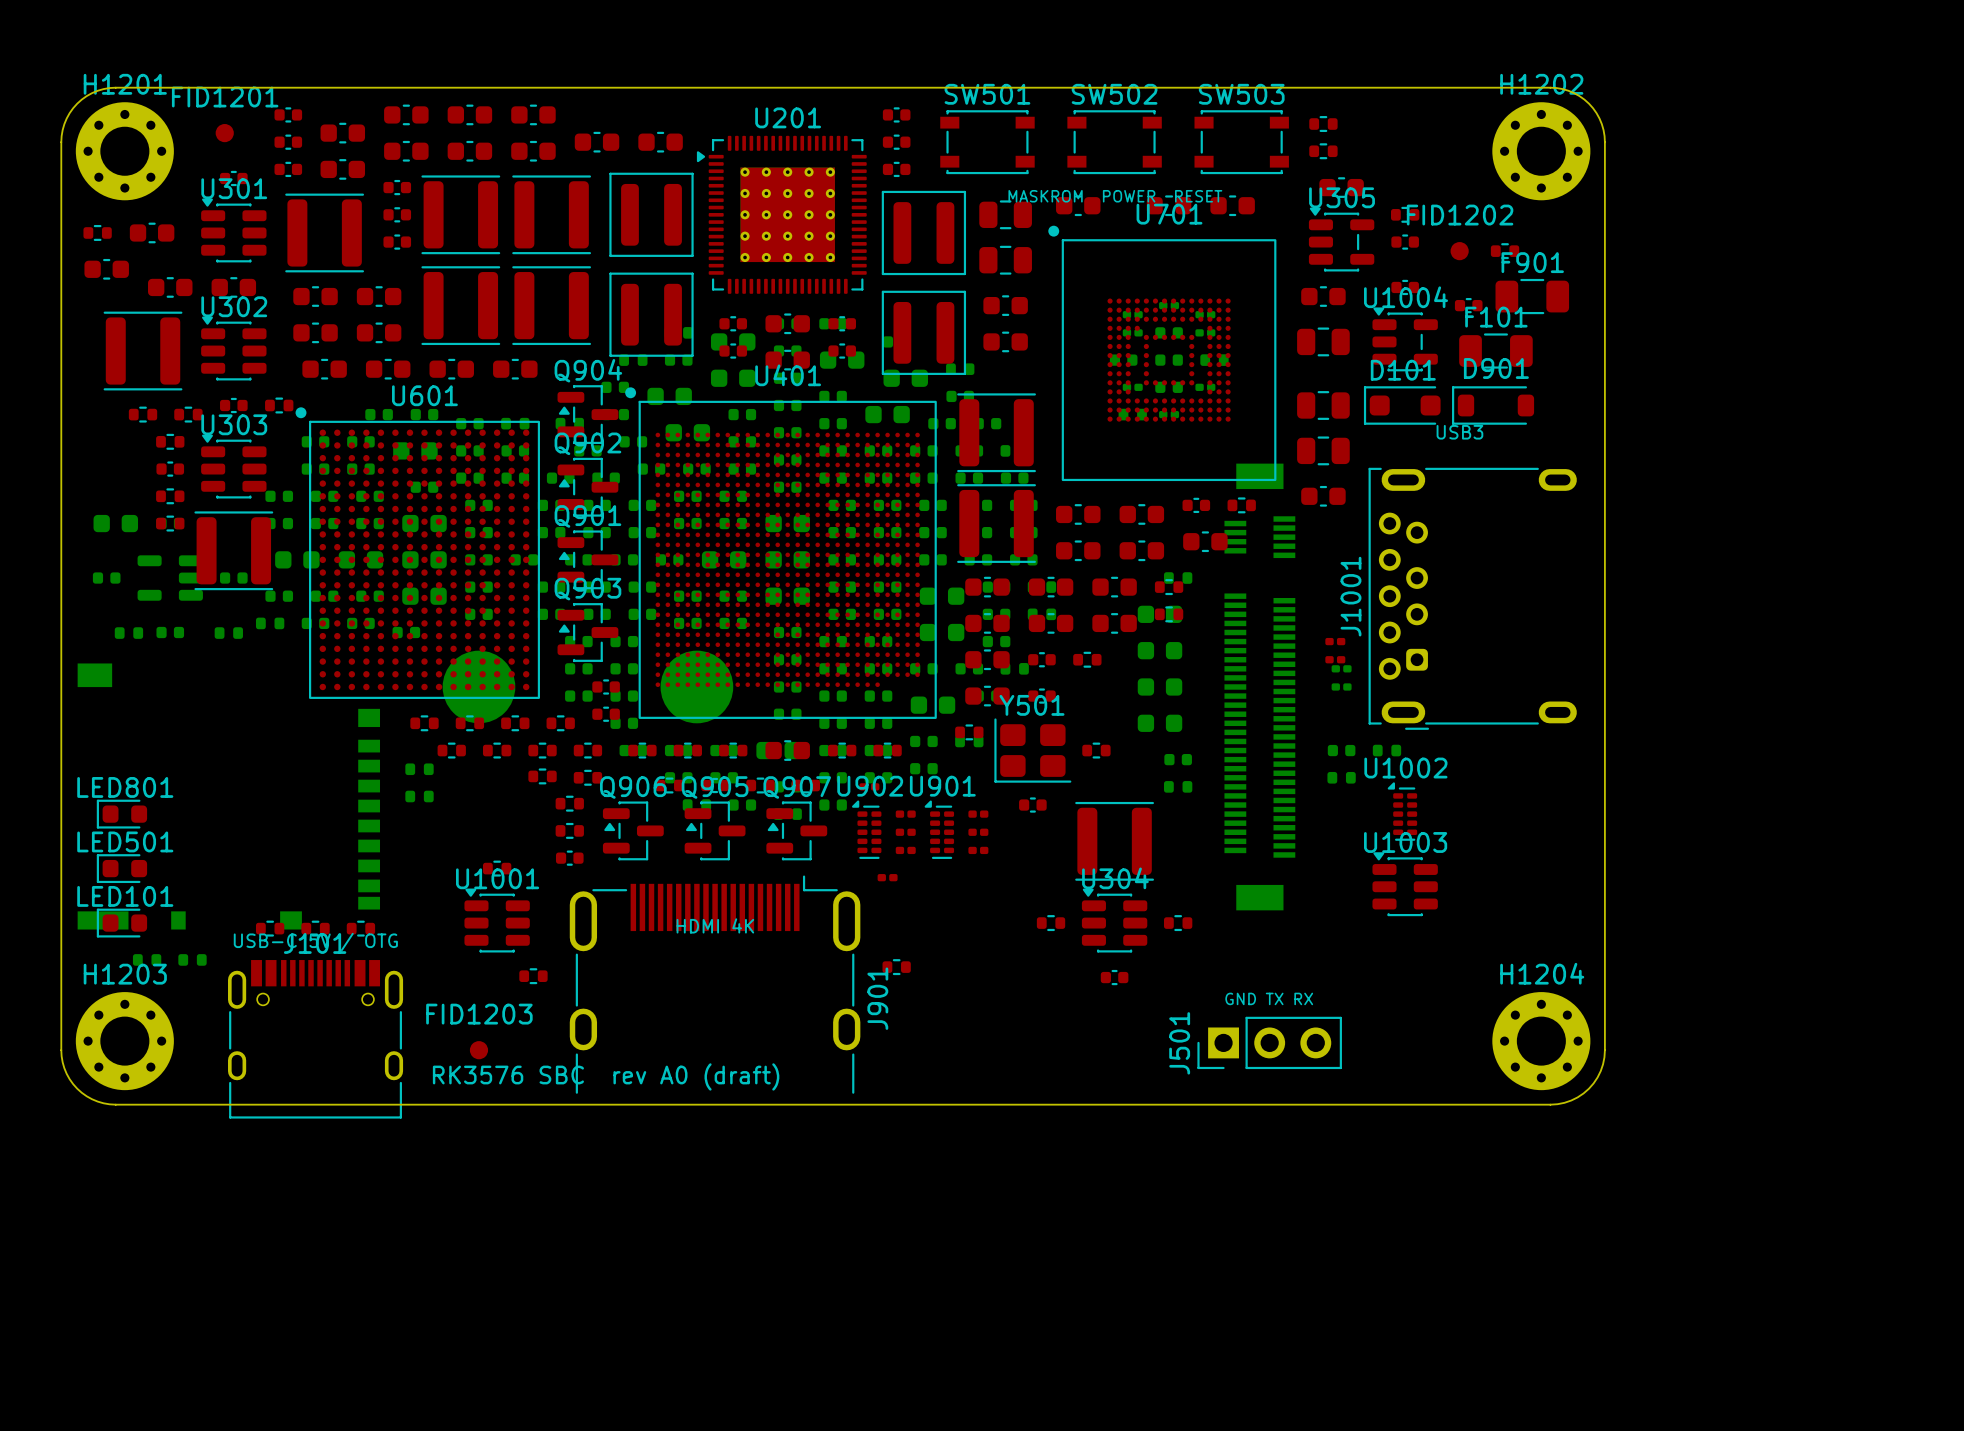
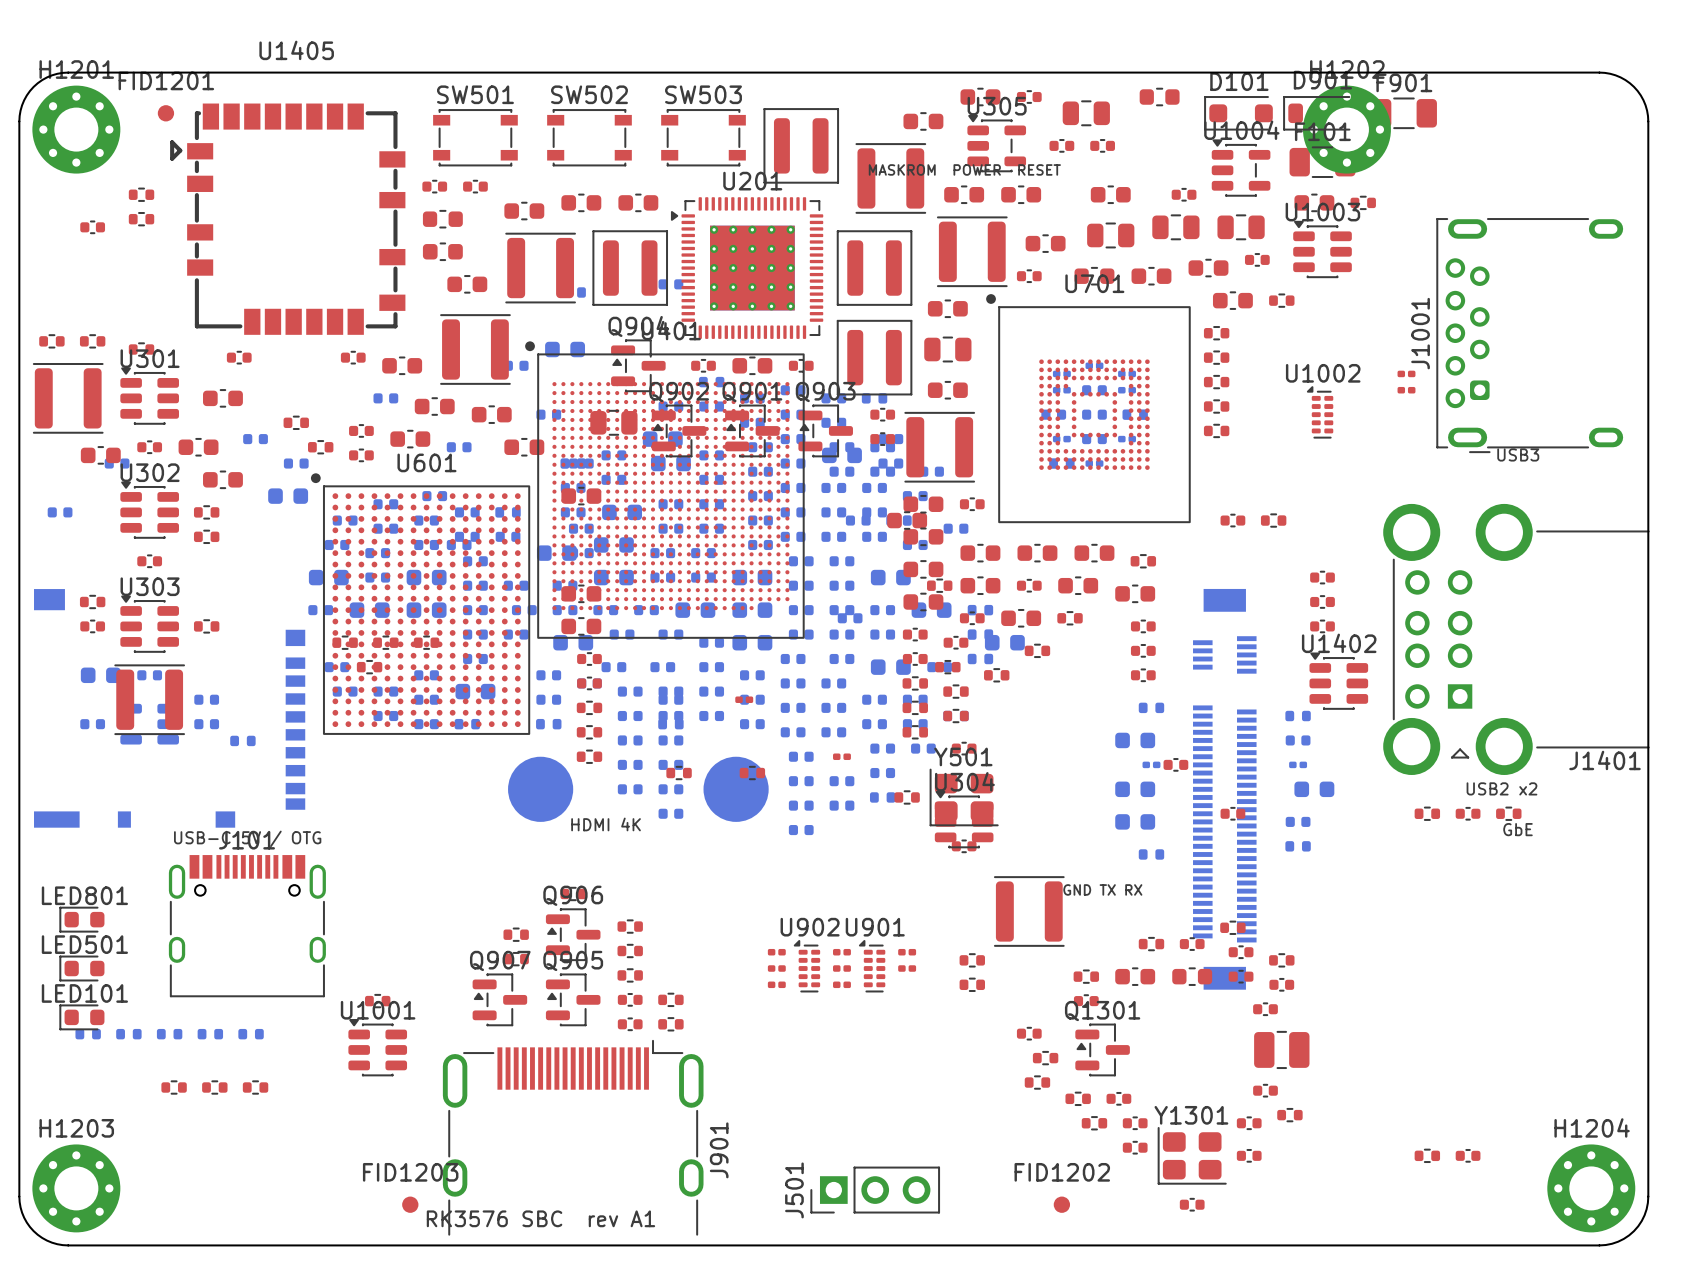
board edge: (1550, 87) (1574, 93) (1588, 103) (1599, 118) (1604, 142) (1604, 1050) (1603, 1064) (1597, 1077) (1588, 1088) (1577, 1097) (1564, 1102) (1550, 1104) (115, 1104) (97, 1101) (77, 1088) (64, 1068) (61, 1050) -> (1355, 72) (1604, 72) (1620, 77) (1634, 86) (1643, 100) (1647, 110) (1648, 1196) (1646, 1209) (1641, 1221) (1634, 1231) (1623, 1238) (1612, 1243) (1599, 1245) (57, 1244) (42, 1237) (33, 1231) (24, 1217) (19, 1202) (19, 935)
part: (288, 114) -> none
part: (406, 114) -> none
part: (469, 114) -> none
part: (533, 114) -> none
part: (896, 114) -> none
part: none -> (980, 97)
part: none -> (1029, 97)
part footprint: [1309, 116, 1338, 133] -> [1139, 87, 1180, 107]
part: (342, 133) -> none
part: none -> (1086, 113)
part: (288, 142) -> none
part: (597, 142) -> none
part: (660, 142) -> none
part: (896, 142) -> none
SW501 position: (987, 142) -> (475, 137)
part: none -> (923, 121)
SW502 position: (1114, 142) -> (589, 137)
SW503 position: (1241, 142) -> (703, 137)
part: (406, 151) -> none
part: (469, 151) -> none
part: (533, 151) -> none
part: (1323, 151) -> none
part: (288, 169) -> none
part: (342, 169) -> none
part: (896, 169) -> none
part: none -> (1061, 145)
part: none -> (1102, 145)
part: (233, 178) -> none
part: (397, 187) -> none
part: (1341, 187) -> none
part: none -> (890, 178)
part: (1078, 205) -> none
part position: (1169, 205) -> (1094, 276)
part: (1232, 205) -> none
part: (397, 214) -> none
part: (460, 214) -> none
part: none -> (434, 186)
part: (551, 214) -> none
part: none -> (475, 186)
part: (651, 214) -> none
U201 position: (781, 214) -> (747, 268)
part: (1005, 214) -> none
part: (1405, 214) -> none
part: none -> (141, 194)
part: none -> (964, 194)
part: none -> (1021, 194)
part: none -> (1110, 194)
part: none -> (1184, 194)
U301 position: (233, 230) -> (149, 396)
part: (97, 232) -> none
part: (152, 232) -> none
part: (324, 232) -> none
part: none -> (581, 202)
part: none -> (638, 202)
part position: (923, 232) -> (801, 145)
part: none -> (1363, 202)
U305 position: (1341, 239) -> (996, 143)
part: (397, 242) -> none
part: none -> (524, 211)
part: (1405, 242) -> none
part footprint: [1490, 243, 1520, 260] -> [1294, 193, 1335, 213]
part: none -> (141, 219)
U1405: none -> (287, 219)
part: none -> (442, 219)
FID1202 position: (1459, 251) -> (1061, 1204)
part: none -> (92, 227)
part: (1005, 260) -> none
part: none -> (1175, 227)
part: none -> (1241, 227)
part: (106, 269) -> none
part: none -> (1110, 235)
part footprint: [609, 272, 694, 357] -> [505, 232, 576, 304]
part: none -> (1045, 243)
part: (170, 287) -> none
part: (233, 287) -> none
part: none -> (442, 251)
part: none -> (972, 251)
part: (1405, 287) -> none
part footprint: [983, 295, 1028, 316] -> [836, 230, 913, 306]
part: (315, 296) -> none
part: (379, 296) -> none
part position: (1323, 296) -> (1151, 276)
part: none -> (1257, 259)
F901 position: (1532, 296) -> (1403, 113)
part: (460, 305) -> none
part: (551, 305) -> none
part: none -> (630, 268)
part: (1169, 305) -> none
part: none -> (1208, 268)
part: (1468, 305) -> none
part: (1132, 314) -> none
part: none -> (1029, 276)
part: (1205, 314) -> none
part: none -> (467, 284)
part: (733, 323) -> none
part: (787, 323) -> none
part: (833, 323) -> none
part: (842, 323) -> none
part: (315, 332) -> none
part: (379, 332) -> none
part: (923, 332) -> none
part: (1132, 332) -> none
part: (1169, 332) -> none
part: (1205, 332) -> none
U1004 position: (1405, 339) -> (1241, 168)
part: (733, 341) -> none
part: (1005, 341) -> none
part: (1323, 341) -> none
part: none -> (1232, 300)
part: none -> (1281, 300)
U302 position: (233, 348) -> (149, 510)
part: (143, 351) -> none
part: (733, 351) -> none
part: (787, 351) -> none
part: (842, 351) -> none
part: none -> (947, 308)
F101 position: (1495, 351) -> (1322, 162)
U701 position: (1162, 353) -> (1088, 408)
part: (633, 360) -> none
part: (678, 360) -> none
part: (787, 360) -> none
part: (842, 360) -> none
part: (1123, 360) -> none
part: (1169, 360) -> none
part: (1214, 360) -> none
part: (324, 369) -> none
part: (388, 369) -> none
part: (451, 369) -> none
part: (515, 369) -> none
part: (960, 369) -> none
part: (733, 378) -> none
part: (787, 378) -> none
part: (905, 378) -> none
part: none -> (1216, 333)
part: none -> (51, 341)
part: none -> (92, 341)
part: (615, 387) -> none
part: (1132, 387) -> none
part: (1169, 387) -> none
part: (1205, 387) -> none
part: none -> (475, 349)
part: (833, 396) -> none
part: (960, 396) -> none
part: none -> (947, 349)
part: (233, 405) -> none
part: (279, 405) -> none
part: none -> (239, 357)
part: (787, 405) -> none
part: none -> (874, 357)
part: (1323, 405) -> none
part: none -> (1216, 357)
D101 position: (1402, 405) -> (1238, 113)
D901 position: (1493, 405) -> (1319, 113)
part: (143, 414) -> none
part position: (188, 414) -> (141, 349)
part: (379, 414) -> none
part side: bottom (424, 414) -> top (353, 357)
part: none -> (402, 365)
Q904 position: (587, 414) -> (638, 365)
part: (742, 414) -> none
part: none -> (703, 365)
part side: bottom (887, 414) -> top (752, 365)
part: none -> (801, 365)
part: (1132, 414) -> none
part: (1169, 414) -> none
part: none -> (1094, 365)
part: (469, 423) -> none
part: (515, 423) -> none
part: (569, 423) -> none
part: (833, 423) -> none
part: (942, 423) -> none
part: (987, 423) -> none
part: none -> (1061, 373)
part: none -> (1127, 373)
part: none -> (1406, 373)
part: (687, 432) -> none
part: (787, 432) -> none
part: none -> (711, 382)
part: (996, 432) -> none
part: none -> (1216, 382)
text position: USB3 (1459, 432) -> USB3 (1518, 454)
part: (170, 441) -> none
part: (315, 441) -> none
part: (360, 441) -> none
part: (633, 441) -> none
part: (742, 441) -> none
part: none -> (793, 390)
part: none -> (947, 390)
part: none -> (1061, 390)
part: none -> (1094, 390)
part: none -> (1127, 390)
part: none -> (1406, 390)
part: none -> (68, 398)
part: none -> (222, 398)
part: (415, 450) -> none
part: (515, 450) -> none
part: (587, 450) -> none
part: (833, 450) -> none
part: (923, 450) -> none
part: (1323, 450) -> none
part: none -> (434, 406)
part: none -> (711, 406)
part: none -> (1216, 406)
U303 position: (233, 466) -> (149, 624)
part position: (170, 469) -> (149, 447)
part: (315, 469) -> none
part: (360, 469) -> none
part: none -> (491, 414)
part: (696, 469) -> none
part: (742, 469) -> none
part: none -> (793, 414)
part: none -> (882, 414)
part: none -> (1053, 414)
part: none -> (1094, 414)
part: none -> (1135, 414)
part: none -> (296, 422)
part: (469, 478) -> none
part: (515, 478) -> none
part: (560, 478) -> none
part: (606, 478) -> none
part: none -> (613, 422)
part: (833, 478) -> none
part: (923, 478) -> none
part: (1014, 478) -> none
part footprint: [773, 481, 802, 493] -> [642, 431, 683, 447]
part: (424, 487) -> none
part: none -> (361, 430)
Q902 position: (587, 487) -> (679, 430)
part: none -> (1216, 430)
part: (170, 496) -> none
part: (279, 496) -> none
part: (370, 496) -> none
part: none -> (410, 439)
part: (687, 496) -> none
part: (733, 496) -> none
part: none -> (793, 439)
part: none -> (882, 439)
part: none -> (890, 439)
part: none -> (1061, 439)
part: none -> (1094, 439)
part: none -> (1127, 439)
part: (1323, 496) -> none
part: none -> (198, 447)
part: none -> (320, 447)
part: (478, 505) -> none
part: (597, 505) -> none
part: none -> (524, 447)
part: (642, 505) -> none
part: (842, 505) -> none
part: (932, 505) -> none
part: none -> (939, 447)
part: (1196, 505) -> none
part: (1241, 505) -> none
part: none -> (100, 455)
part: none -> (361, 455)
part: none -> (613, 455)
part: none -> (711, 455)
part: none -> (841, 455)
part: (1078, 514) -> none
part: (1141, 514) -> none
part: (115, 523) -> none
part: (170, 523) -> none
part: (279, 523) -> none
part: (324, 523) -> none
part: (424, 523) -> none
part: none -> (573, 463)
part: (733, 523) -> none
part: none -> (793, 463)
part: (996, 523) -> none
part: none -> (890, 463)
part: none -> (1061, 463)
part: none -> (1094, 463)
part: (478, 532) -> none
part: (551, 532) -> none
part: (597, 532) -> none
part: (642, 532) -> none
part: (842, 532) -> none
part: (932, 532) -> none
part: none -> (931, 471)
part: none -> (222, 479)
part: none -> (613, 479)
part: none -> (711, 479)
part: (1205, 541) -> none
part: (233, 550) -> none
part: none -> (573, 487)
part: none -> (793, 487)
part: none -> (833, 487)
part: none -> (874, 487)
part position: (1078, 550) -> (923, 504)
part: (1141, 550) -> none
part footprint: [765, 551, 810, 569] -> [658, 499, 684, 510]
U601 position: (417, 553) -> (420, 604)
part: (297, 559) -> none
part: (424, 559) -> none
part: (478, 559) -> none
part: (578, 559) -> none
Q901 position: (587, 559) -> (752, 430)
part: (624, 559) -> none
part: (669, 559) -> none
part: none -> (581, 496)
part position: (724, 559) -> (622, 512)
part: (842, 559) -> none
part: (932, 559) -> none
part: (978, 559) -> none
part: (1023, 559) -> none
part: none -> (915, 496)
part: none -> (385, 504)
part: none -> (711, 504)
part: none -> (972, 504)
part position: (170, 578) -> (149, 724)
part: (233, 578) -> none
part: none -> (206, 512)
part: none -> (467, 512)
part: none -> (508, 512)
part: none -> (573, 512)
part: none -> (793, 512)
part: none -> (833, 512)
part: none -> (874, 512)
part: (1178, 578) -> none
part footprint: [402, 587, 447, 605] -> [332, 515, 358, 526]
part: (478, 587) -> none
part: none -> (426, 520)
part: (551, 587) -> none
part: (597, 587) -> none
part: (642, 587) -> none
part footprint: [765, 587, 810, 605] -> [658, 523, 684, 534]
part: (842, 587) -> none
part: (987, 587) -> none
part: (1114, 587) -> none
part: (1169, 587) -> none
part: none -> (1232, 520)
part: none -> (1273, 520)
part: (279, 596) -> none
part: (324, 596) -> none
part: (370, 596) -> none
part: none -> (385, 528)
part: (733, 596) -> none
part: none -> (711, 528)
part: (942, 596) -> none
part: none -> (956, 528)
J1001 position: (1472, 598) -> (1529, 335)
part: none -> (206, 536)
part: none -> (467, 536)
part: none -> (508, 536)
part: none -> (793, 536)
part: none -> (833, 536)
part: none -> (874, 536)
part: none -> (923, 536)
part: (478, 614) -> none
part: none -> (426, 544)
part: (597, 614) -> none
part: (642, 614) -> none
part: none -> (613, 544)
part: (842, 614) -> none
part: (996, 614) -> none
part: (1041, 614) -> none
part: none -> (915, 544)
part: (1159, 614) -> none
part: (1169, 614) -> none
part: (270, 623) -> none
part: (315, 623) -> none
part: (360, 623) -> none
part: none -> (377, 553)
part: none -> (556, 553)
part: (733, 623) -> none
part: none -> (662, 553)
part: none -> (703, 553)
part footprint: [919, 623, 965, 642] -> [788, 556, 814, 567]
part: (987, 623) -> none
part: (1051, 623) -> none
part position: (1114, 623) -> (980, 553)
part: none -> (1037, 553)
part: none -> (1094, 553)
part: (170, 632) -> none
part: none -> (149, 561)
part position: (406, 632) -> (336, 544)
part: none -> (475, 561)
Q903 position: (587, 632) -> (825, 430)
part: (787, 632) -> none
part: none -> (841, 561)
part: none -> (1143, 561)
part: (128, 633) -> none
part: (228, 633) -> none
part: (578, 641) -> none
part: (624, 641) -> none
part: (833, 641) -> none
part: (878, 641) -> none
part: (996, 641) -> none
part: none -> (923, 569)
part: (1335, 641) -> none
part: none -> (328, 577)
part: none -> (377, 577)
part: none -> (426, 577)
part: none -> (613, 577)
part: none -> (662, 577)
part: none -> (703, 577)
part: none -> (752, 577)
part: none -> (890, 577)
part: (1159, 650) -> none
part: none -> (1322, 577)
part: none -> (475, 585)
part: none -> (516, 585)
part: none -> (565, 585)
part: (787, 659) -> none
part: none -> (801, 585)
part: none -> (841, 585)
part: (987, 659) -> none
part: (1041, 659) -> none
part: none -> (980, 585)
part: none -> (1029, 585)
part: none -> (1078, 585)
part: (1335, 659) -> none
part: (578, 668) -> none
part: (624, 668) -> none
part: none -> (581, 593)
part: (833, 668) -> none
part: (878, 668) -> none
part: (923, 668) -> none
part: (969, 668) -> none
part: (1014, 668) -> none
part: none -> (1135, 593)
part: (1341, 668) -> none
part: none -> (92, 601)
part: none -> (923, 601)
part: none -> (1322, 601)
part: none -> (320, 610)
part: none -> (369, 610)
part: (478, 686) -> none
part: none -> (426, 610)
part: none -> (475, 610)
part: (606, 686) -> none
part: none -> (524, 610)
part: none -> (565, 610)
part: (696, 686) -> none
part: none -> (605, 610)
part: none -> (646, 610)
part: (787, 686) -> none
part: none -> (695, 610)
part: none -> (752, 610)
part: none -> (801, 610)
part: none -> (841, 610)
part: none -> (882, 610)
part: none -> (931, 610)
part: none -> (980, 610)
part: (1159, 686) -> none
part position: (1259, 686) -> (1224, 789)
part: (1341, 686) -> none
part: (578, 696) -> none
part: (624, 696) -> none
part: (833, 696) -> none
part: (878, 696) -> none
part: (987, 696) -> none
part: (1041, 696) -> none
part: none -> (972, 618)
part: none -> (1021, 618)
part: none -> (1070, 618)
part: none -> (92, 626)
part: none -> (206, 626)
part: none -> (581, 626)
part: (932, 705) -> none
part: none -> (1143, 626)
part: none -> (1322, 626)
part: none -> (475, 634)
part: (606, 714) -> none
part: none -> (516, 634)
part: none -> (622, 634)
part: none -> (801, 634)
part: none -> (841, 634)
part: none -> (882, 634)
part: none -> (915, 634)
part: none -> (980, 634)
part footprint: [864, 717, 893, 729] -> [732, 634, 773, 651]
J1401: none -> (1516, 639)
part: (560, 723) -> none
part: (624, 723) -> none
part: none -> (573, 642)
part: none -> (956, 642)
part: (969, 732) -> none
part: none -> (1037, 650)
part: none -> (1143, 650)
part: none -> (475, 659)
part: none -> (589, 659)
part footprint: [756, 741, 801, 760] -> [650, 662, 676, 673]
part: (969, 741) -> none
part: none -> (841, 659)
part: none -> (915, 659)
part: none -> (980, 659)
part: none -> (336, 667)
part: (497, 750) -> none
part: (542, 750) -> none
part: (587, 750) -> none
part: (633, 750) -> none
part: (642, 750) -> none
part: (678, 750) -> none
part: (687, 750) -> none
part: (733, 750) -> none
part: (787, 750) -> none
part: (842, 750) -> none
part: (878, 750) -> none
part: (887, 750) -> none
Y501 position: (1032, 750) -> (964, 797)
part: none -> (890, 667)
part: none -> (939, 667)
part: (1341, 750) -> none
part: (1386, 750) -> none
part: none -> (100, 675)
part: none -> (149, 675)
part: none -> (426, 675)
part: none -> (548, 675)
part: none -> (752, 675)
part: none -> (996, 675)
part: (1178, 759) -> none
part: none -> (1143, 675)
U1402: none -> (1338, 681)
part: none -> (589, 683)
part: none -> (833, 683)
part: none -> (915, 683)
part: (419, 769) -> none
part: (542, 776) -> none
part: none -> (345, 691)
part: none -> (385, 691)
part: none -> (475, 691)
part: (587, 777) -> none
part: (678, 777) -> none
part: (724, 777) -> none
part: none -> (630, 691)
part: none -> (670, 691)
part: (878, 777) -> none
part: none -> (956, 691)
part position: (1341, 777) -> (1151, 707)
part: (669, 785) -> none
part: (715, 785) -> none
part: (760, 785) -> none
part: (805, 785) -> none
part: none -> (149, 699)
part: none -> (206, 699)
part: none -> (426, 699)
part: none -> (548, 699)
part: none -> (752, 699)
part: none -> (874, 699)
part: none -> (915, 699)
part: (1178, 786) -> none
part: none -> (589, 707)
part: none -> (793, 707)
part: none -> (833, 707)
part: none -> (915, 707)
part: (419, 796) -> none
part footprint: [1075, 801, 1155, 881] -> [951, 741, 977, 756]
part: (569, 803) -> none
part: none -> (385, 716)
part position: (696, 805) -> (548, 724)
part: none -> (670, 716)
part: (1032, 805) -> none
part: none -> (956, 716)
part: none -> (1298, 716)
U1002 position: (1402, 811) -> (1320, 412)
LED801 position: (121, 814) -> (81, 919)
part: none -> (92, 724)
part: none -> (206, 724)
part: none -> (426, 724)
part: none -> (467, 724)
part: none -> (752, 724)
part: (905, 814) -> none
part: (978, 814) -> none
part: none -> (874, 724)
part: none -> (915, 724)
part: none -> (589, 732)
part: none -> (793, 732)
part: none -> (833, 732)
part: none -> (915, 732)
U902 position: (866, 829) -> (806, 966)
U901 position: (939, 829) -> (872, 966)
part: (569, 830) -> none
Q906 position: (633, 830) -> (573, 934)
Q905 position: (715, 830) -> (573, 999)
Q907 position: (796, 830) -> (499, 999)
part: none -> (242, 740)
part: none -> (630, 740)
part: none -> (670, 740)
part: (905, 832) -> none
part: (978, 832) -> none
part: none -> (1135, 740)
part: none -> (1298, 740)
part: none -> (882, 748)
part: none -> (923, 748)
part: none -> (589, 756)
part: (905, 850) -> none
part: none -> (801, 756)
part: (569, 858) -> none
part: none -> (630, 764)
part: none -> (670, 764)
part: none -> (1151, 764)
part: none -> (1175, 764)
part: none -> (1298, 764)
LED501 position: (121, 868) -> (81, 968)
part: (497, 868) -> none
part: none -> (679, 773)
part: none -> (882, 773)
part footprint: [877, 874, 898, 882] -> [739, 765, 766, 781]
part: none -> (801, 781)
part: none -> (841, 781)
U1003 position: (1405, 884) -> (1322, 249)
part: none -> (540, 789)
part: none -> (630, 789)
part: none -> (670, 789)
part: none -> (736, 789)
part: none -> (1135, 789)
part: none -> (1314, 789)
text: none -> USB2 x2 (1501, 788)
part: none -> (882, 797)
part: none -> (801, 805)
part: none -> (841, 805)
part: none -> (670, 813)
part: none -> (1232, 813)
part: none -> (1427, 813)
part: none -> (1468, 813)
part: none -> (1508, 813)
U1001 position: (497, 920) -> (377, 1047)
LED101 position: (121, 923) -> (81, 1017)
part position: (1051, 923) -> (907, 797)
part: (1178, 923) -> none
part: none -> (1135, 821)
part: none -> (1298, 821)
part: (270, 928) -> none
part: (315, 928) -> none
part: (360, 928) -> none
text: none -> GbE (1517, 829)
part: none -> (801, 830)
part: none -> (1298, 846)
part: (147, 959) -> none
part: (192, 959) -> none
part: none -> (1151, 854)
part: (896, 967) -> none
part: (533, 976) -> none
part position: (1114, 977) -> (964, 846)
J901 position: (715, 984) -> (573, 1137)
part: none -> (573, 893)
part: none -> (1029, 911)
part: none -> (630, 926)
H1203 position: (124, 1041) -> (76, 1188)
part: none -> (1232, 927)
H1204 position: (1541, 1041) -> (1591, 1188)
J501 position: (1269, 1042) -> (875, 1190)
part: none -> (516, 934)
FID1203 position: (478, 1050) -> (410, 1204)
part: none -> (1151, 944)
part: none -> (1192, 944)
part: none -> (630, 950)
part: none -> (776, 952)
part: none -> (841, 952)
part: none -> (907, 952)
part: none -> (1241, 952)
text: RK3576 SBC rev A0 (draft) (606, 1076) -> none
part: none -> (516, 959)
part: none -> (972, 960)
part: none -> (1281, 960)
part: none -> (776, 968)
part: none -> (841, 968)
part: none -> (907, 968)
part: none -> (630, 975)
part: none -> (1086, 976)
part: none -> (1135, 976)
part: none -> (1192, 976)
part: none -> (1241, 976)
part: none -> (776, 984)
part: none -> (841, 984)
part: none -> (972, 984)
part: none -> (1281, 984)
part: none -> (630, 999)
part: none -> (670, 999)
part: none -> (377, 1001)
part: none -> (1086, 1001)
part: none -> (1265, 1009)
part: none -> (630, 1024)
part: none -> (670, 1024)
part: none -> (88, 1034)
part: none -> (128, 1034)
part: none -> (169, 1034)
part: none -> (210, 1034)
part: none -> (251, 1034)
part: none -> (1029, 1033)
Q1301: none -> (1102, 1049)
part: none -> (1281, 1049)
part: none -> (1045, 1058)
part: none -> (1037, 1082)
part: none -> (174, 1087)
part: none -> (214, 1087)
part: none -> (255, 1087)
part: none -> (1265, 1090)
part: none -> (1078, 1098)
part: none -> (1118, 1098)
part: none -> (1289, 1115)
part: none -> (1094, 1123)
part: none -> (1135, 1123)
part: none -> (1249, 1123)
part: none -> (1135, 1147)
Y1301: none -> (1192, 1155)
part: none -> (1249, 1155)
part: none -> (1427, 1155)
part: none -> (1468, 1155)
part: none -> (1192, 1204)
text: none -> RK3576 SBC rev A1 (540, 1218)

